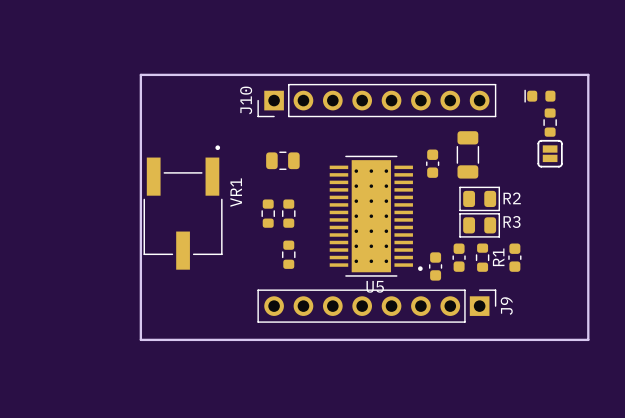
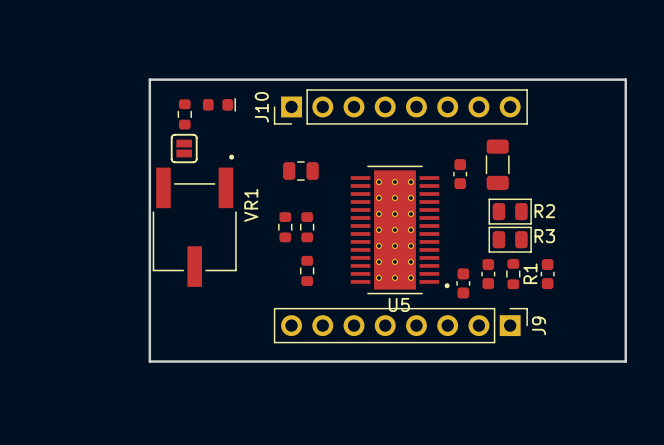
part: (539, 96) -> none
part: none -> (219, 104)
part: none -> (184, 114)
part: (550, 122) -> none
part: none -> (184, 148)
part: (550, 153) -> none

